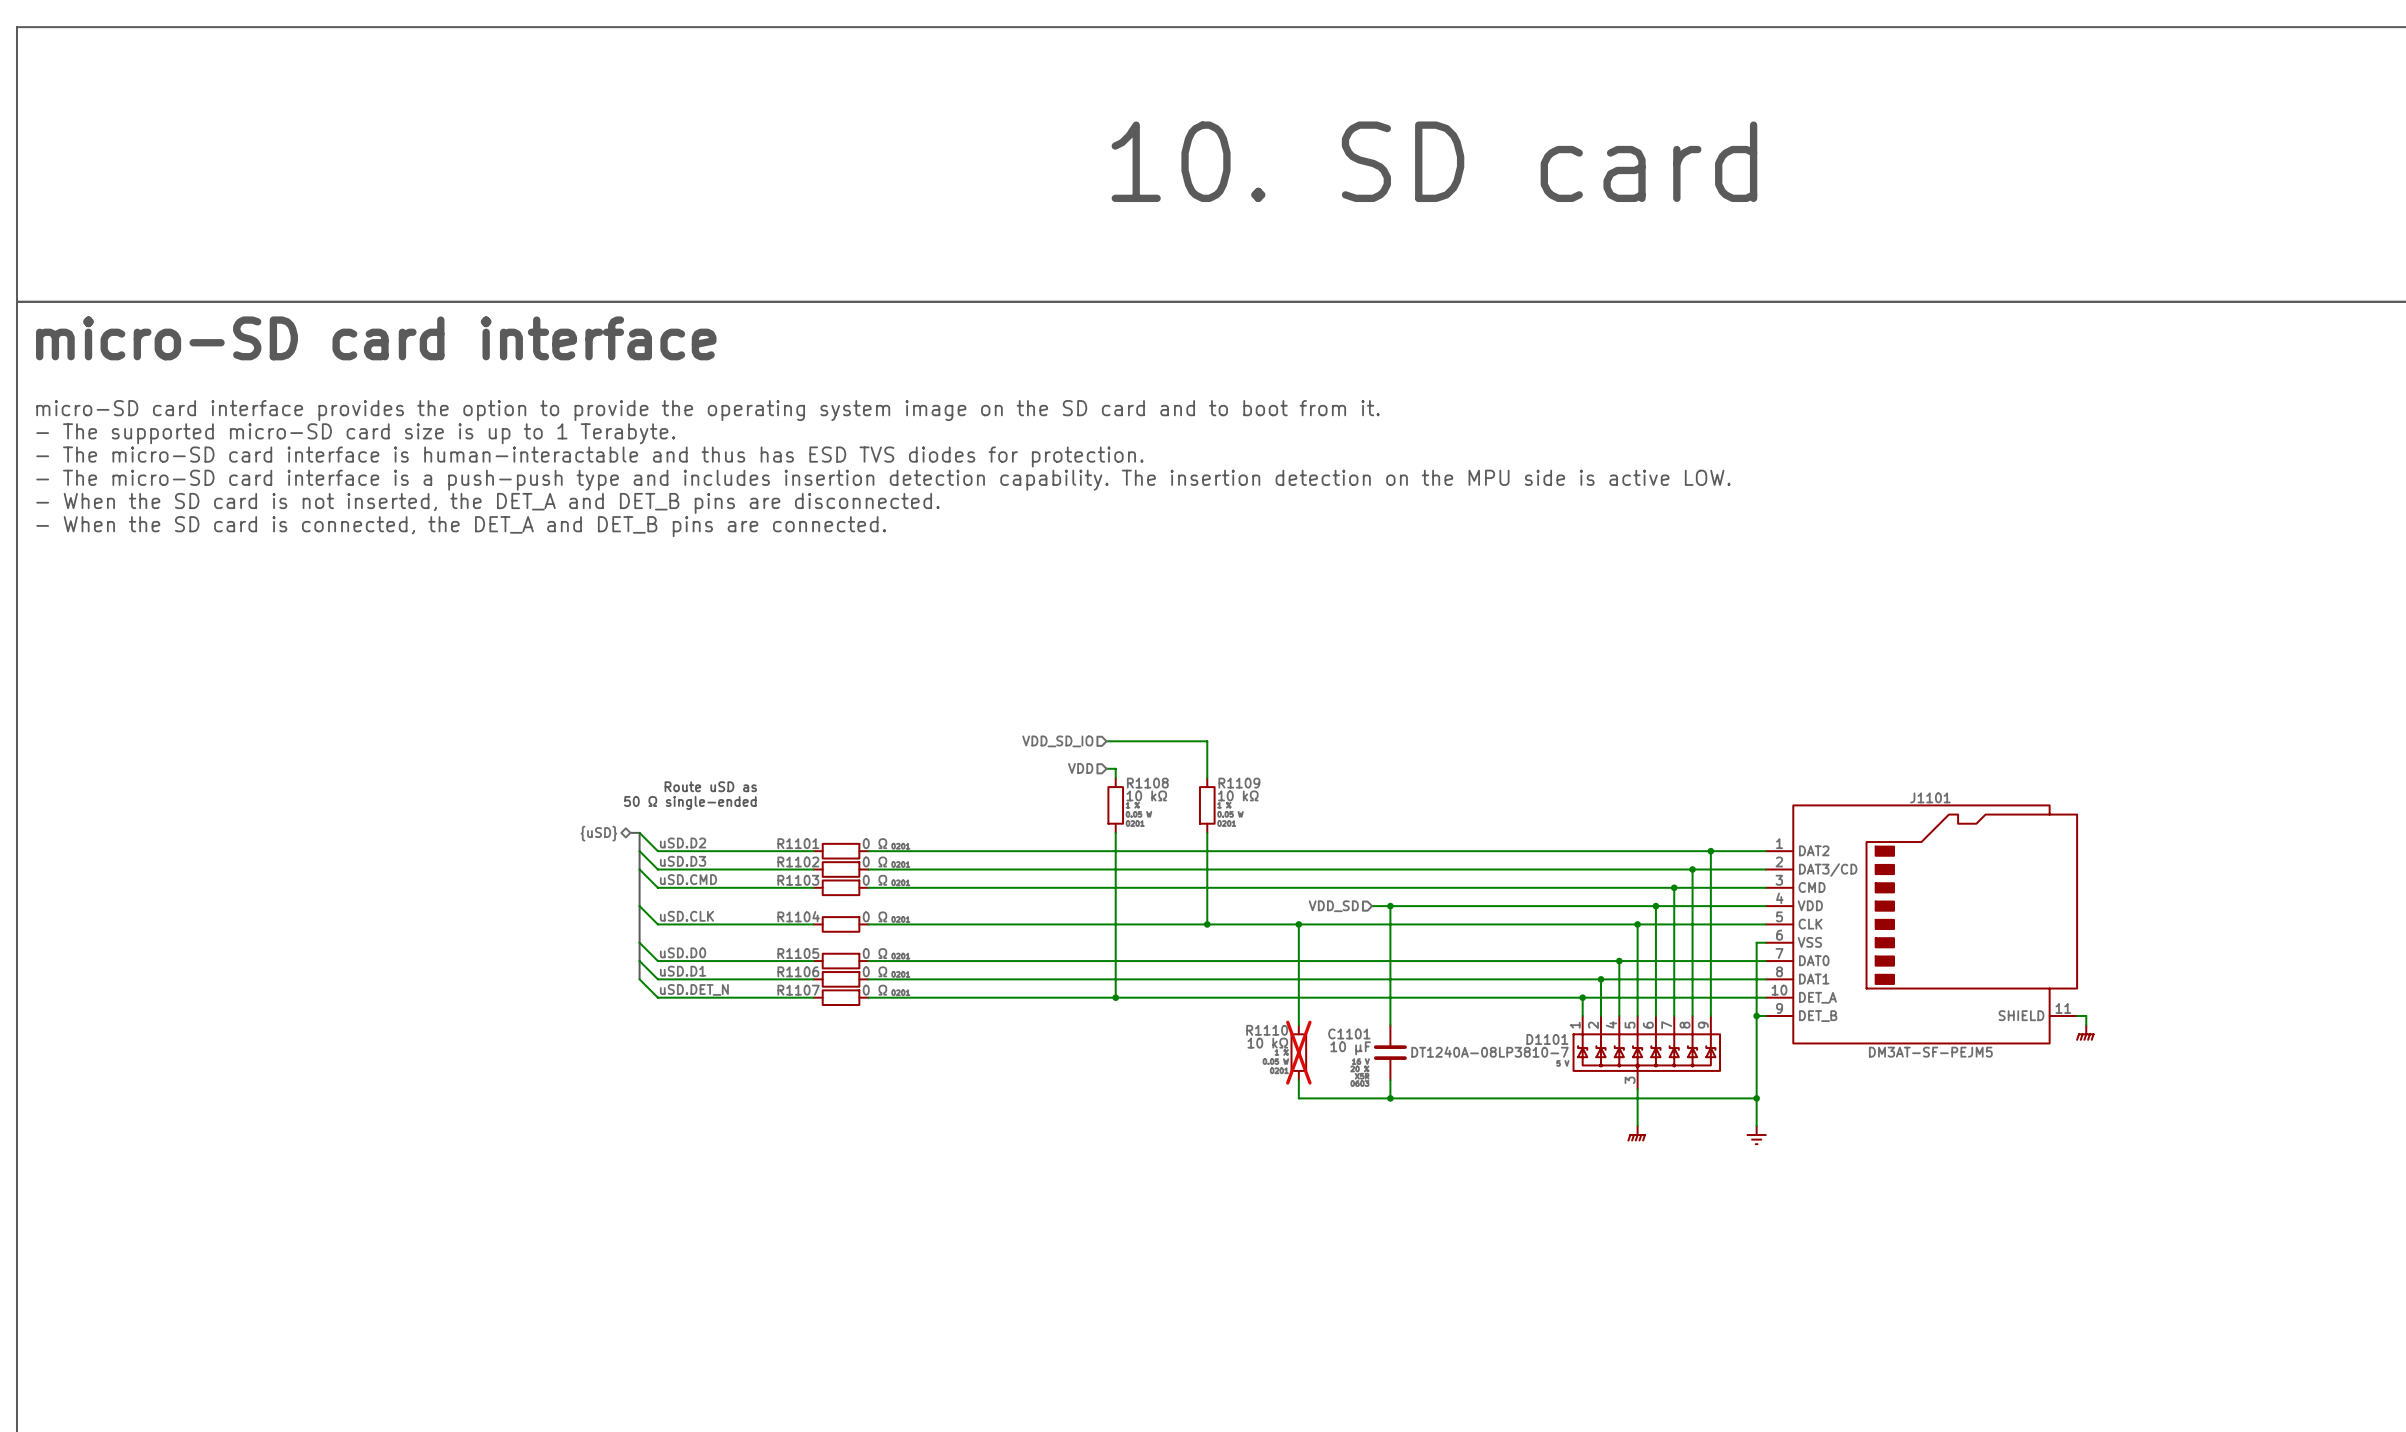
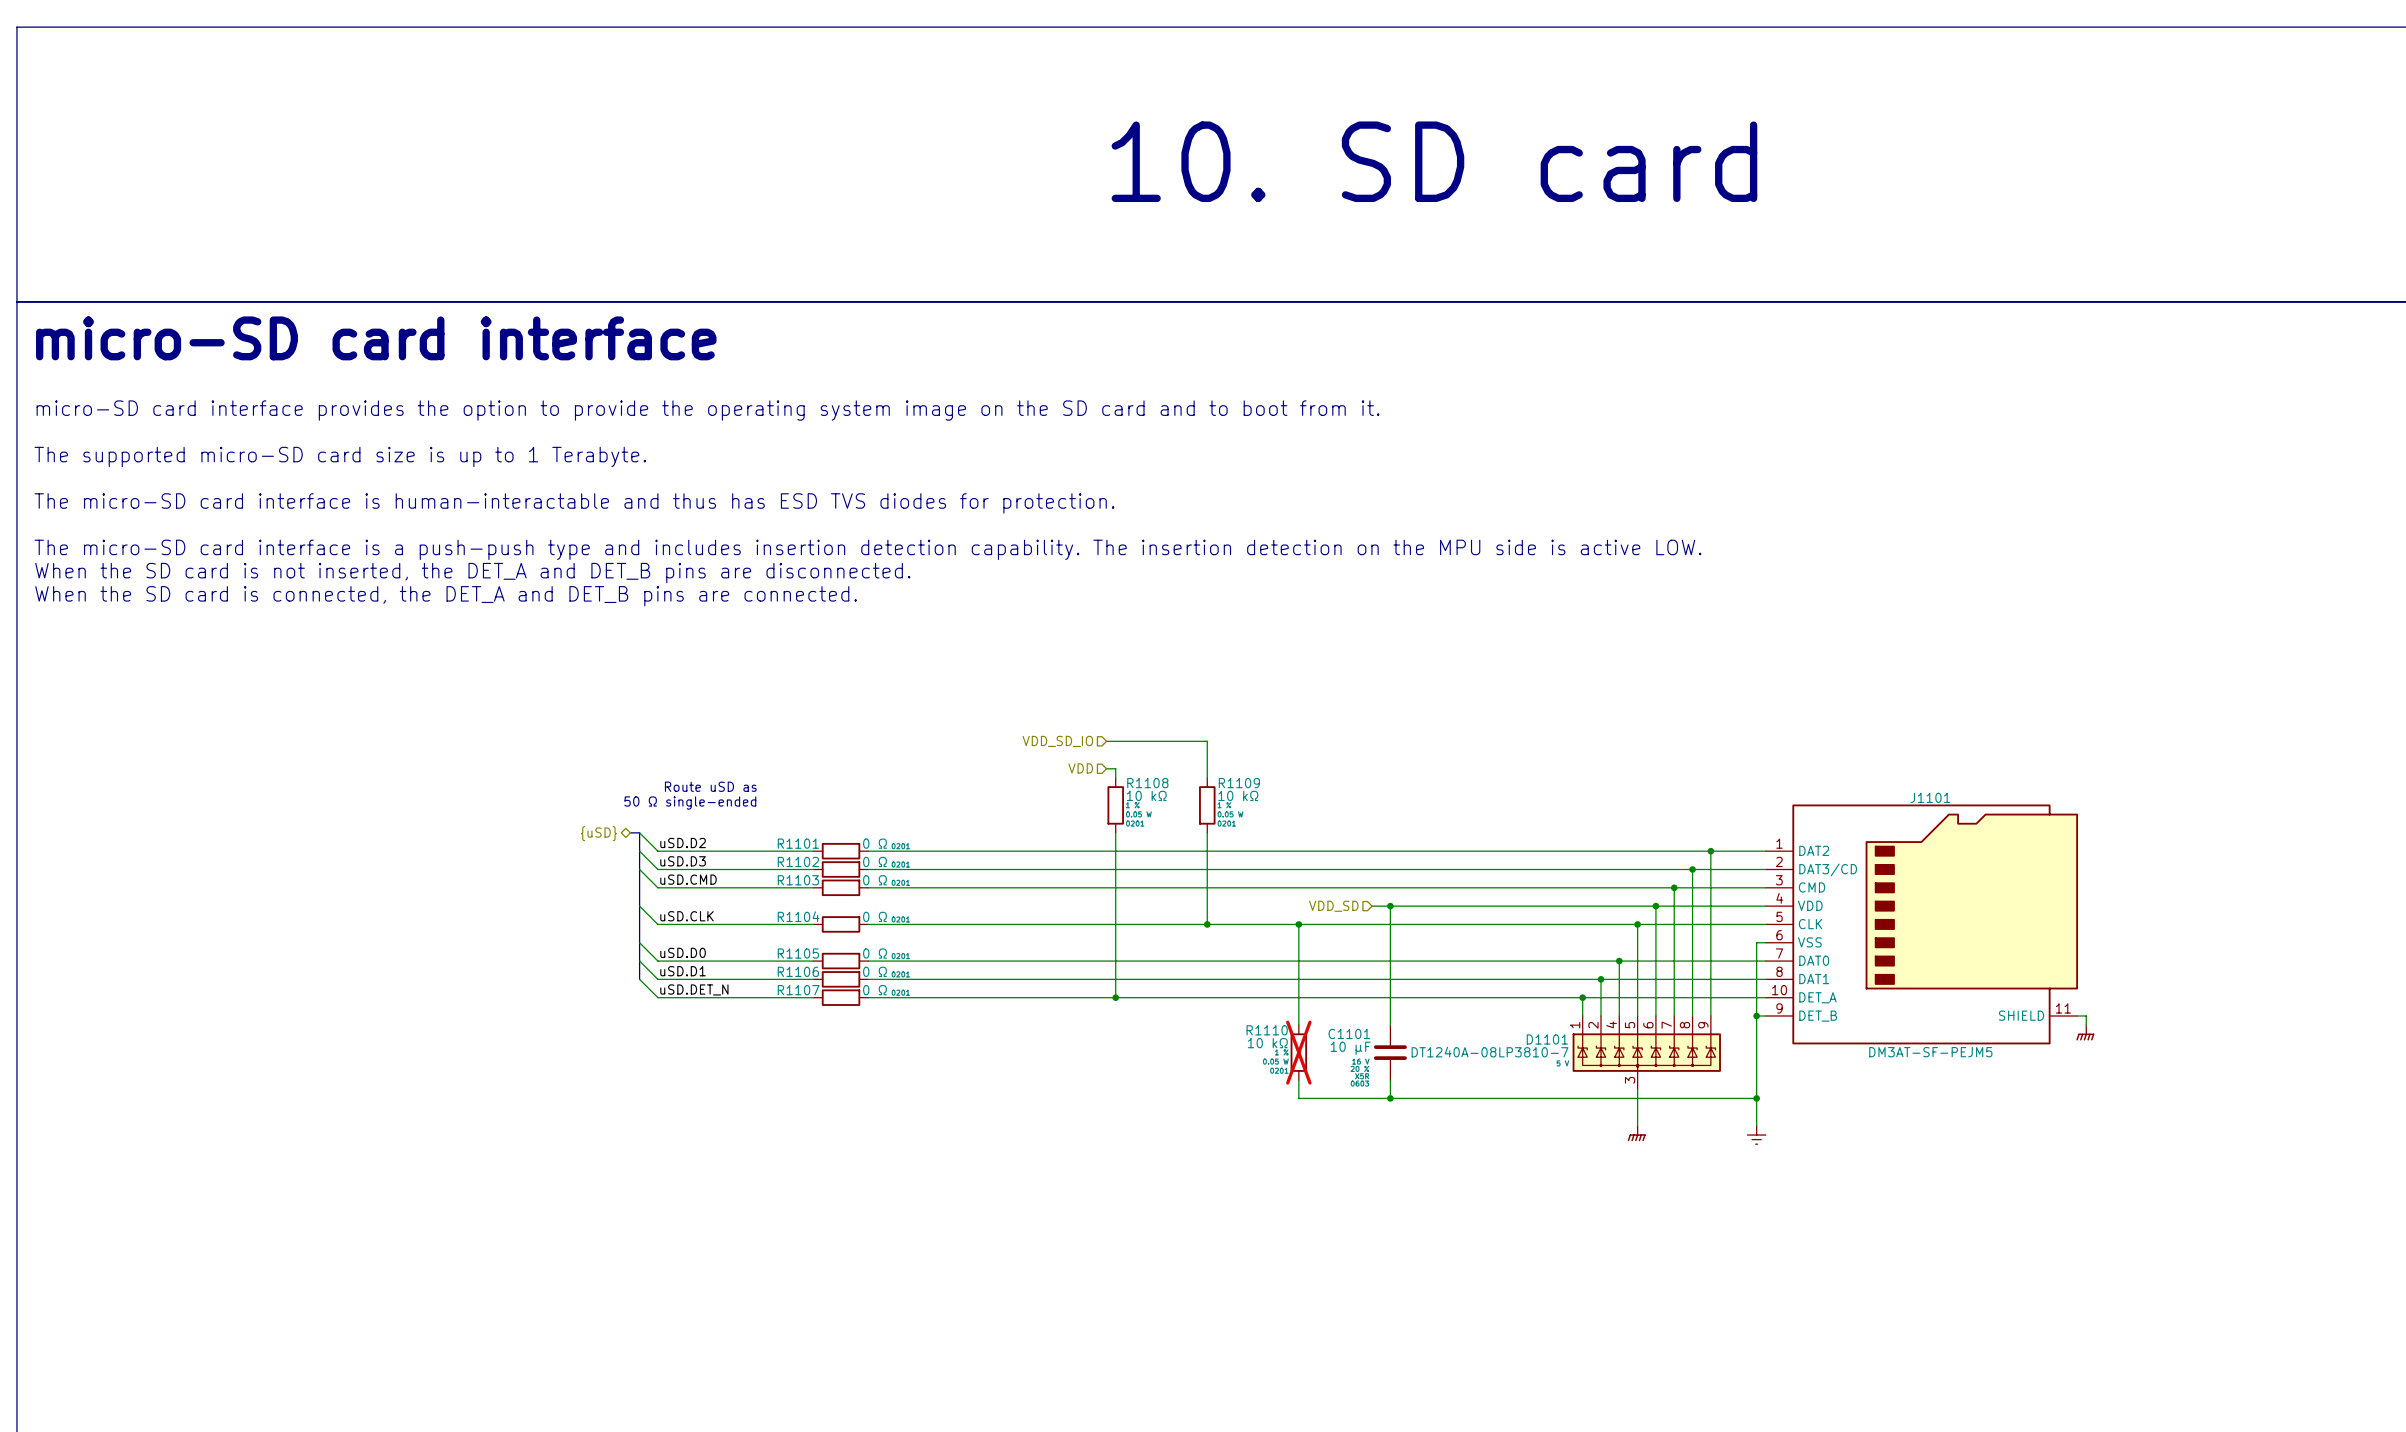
text: - The supported micro-SD card size is up to 1 Terabyte. (355, 433) -> none
text: - The micro-SD card interface is human-interactable and thus has ESD TVS diodes for protection. (589, 456) -> The supported micro-SD card size is up to 1 Terabyte. (340, 456)
text: - The micro-SD card interface is a push-push type and includes insertion detection capability. The insertion detection on the MPU side is active LOW. (883, 480) -> none
text: - When the SD card is not inserted, the DET_A and DET_B pins are disconnected. (487, 503) -> The micro-SD card interface is human-interactable and thus has ESD TVS diodes for protection. (574, 503)
text: - When the SD card is connected, the DET_A and DET_B pins are connected. (461, 526) -> none
text: none -> The micro-SD card interface is a push-push type and includes insertion detection capability. The insertion detection on the MPU side is active LOW. (867, 549)
text: none -> When the SD card is not inserted, the DET_A and DET_B pins are disconnected. (472, 573)
text: none -> When the SD card is connected, the DET_A and DET_B pins are connected. (446, 596)

